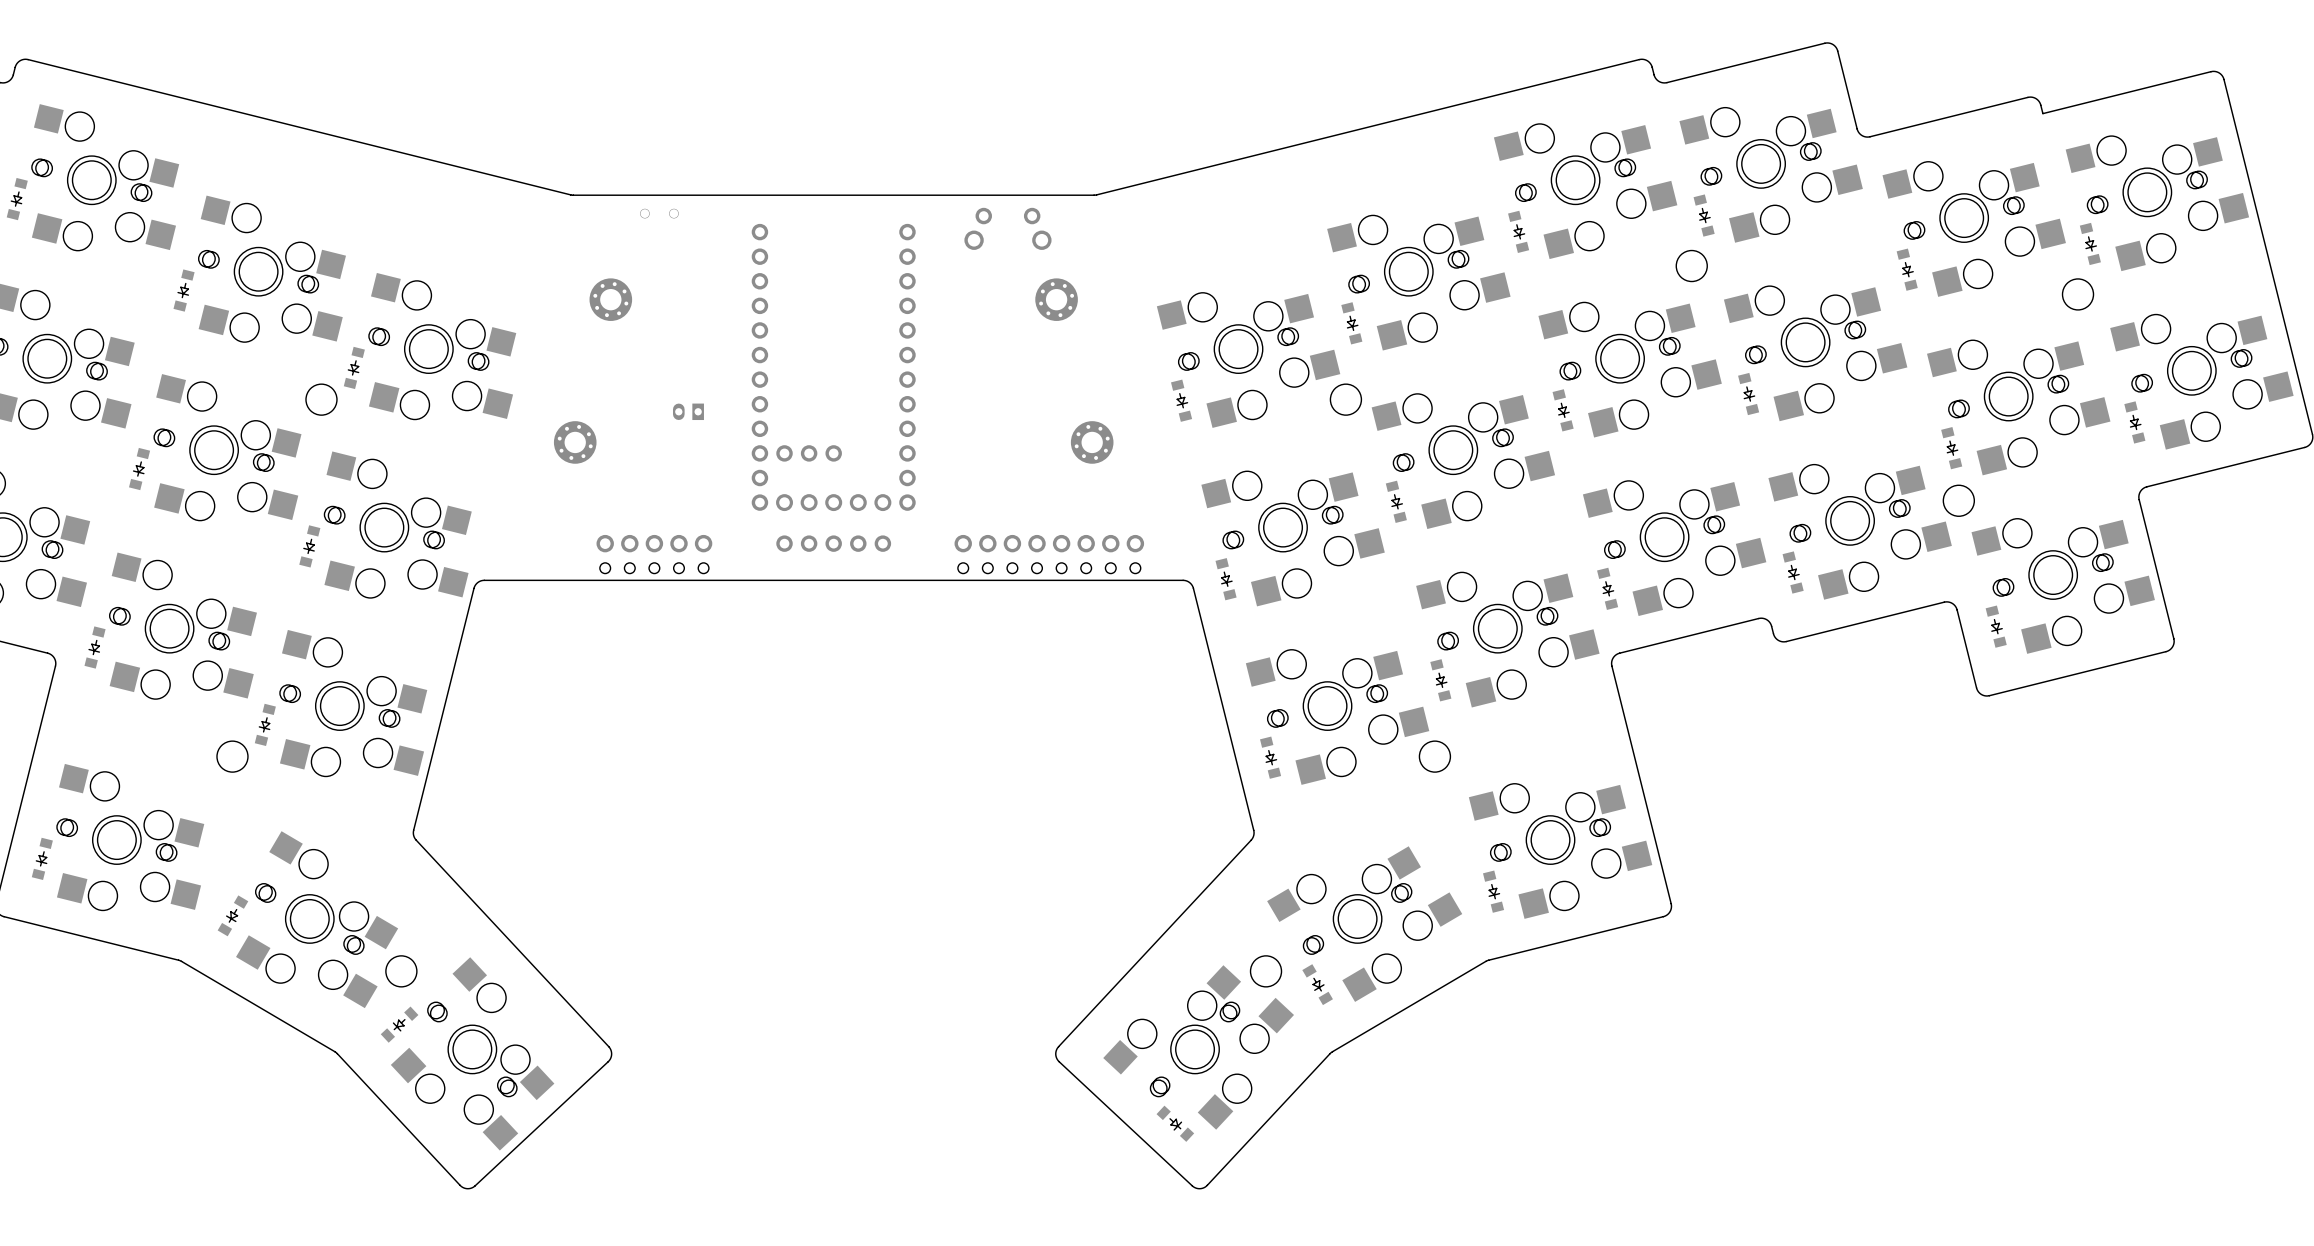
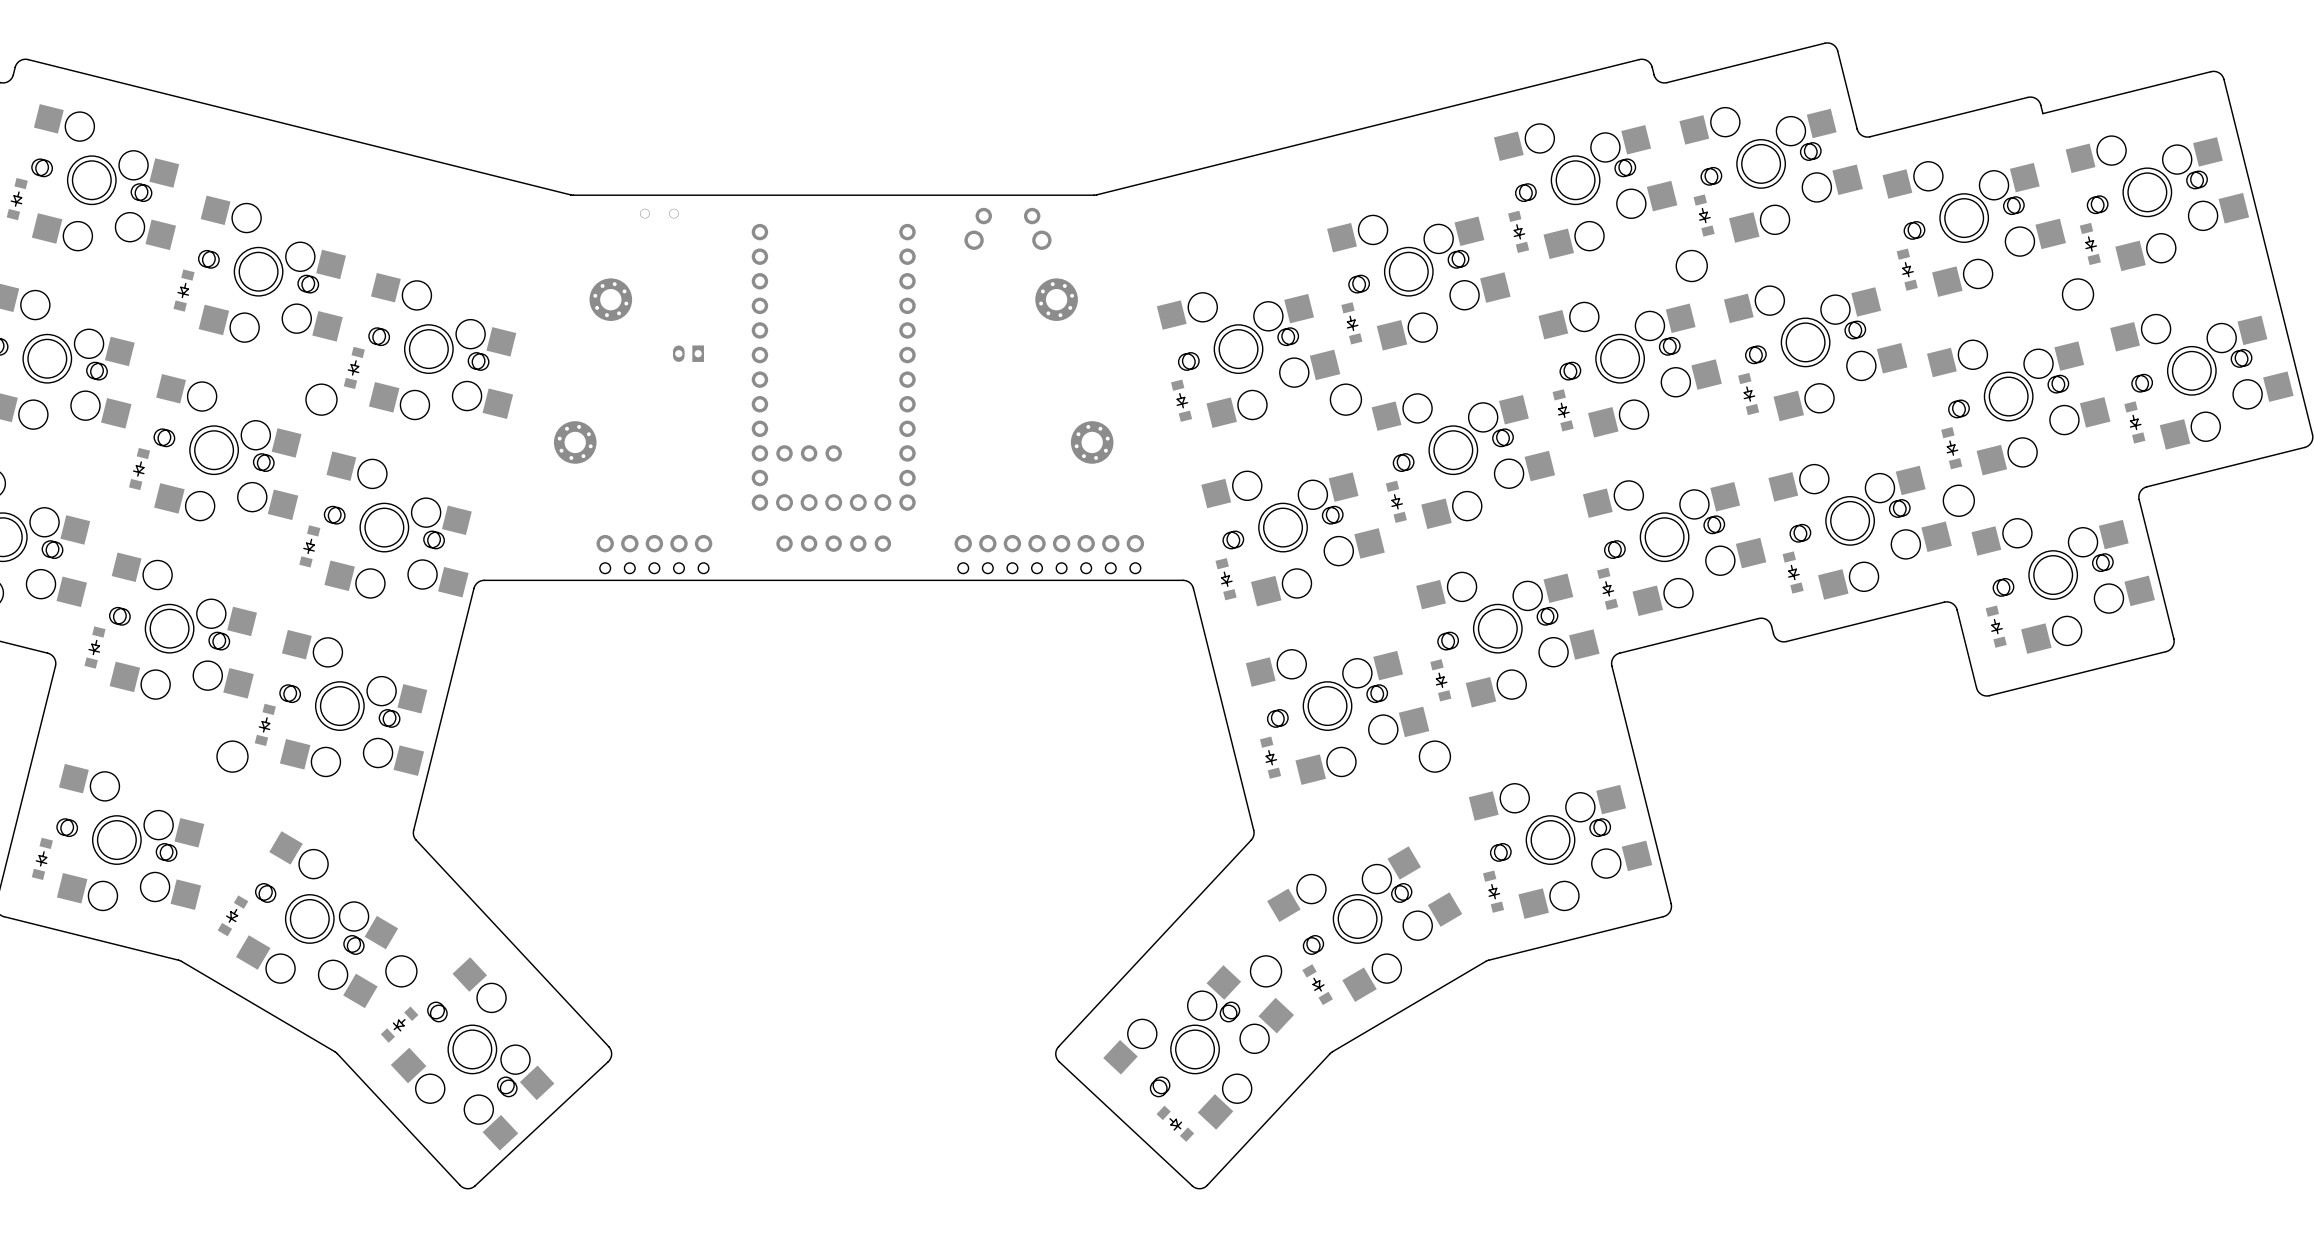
part position: (688, 411) -> (688, 353)

